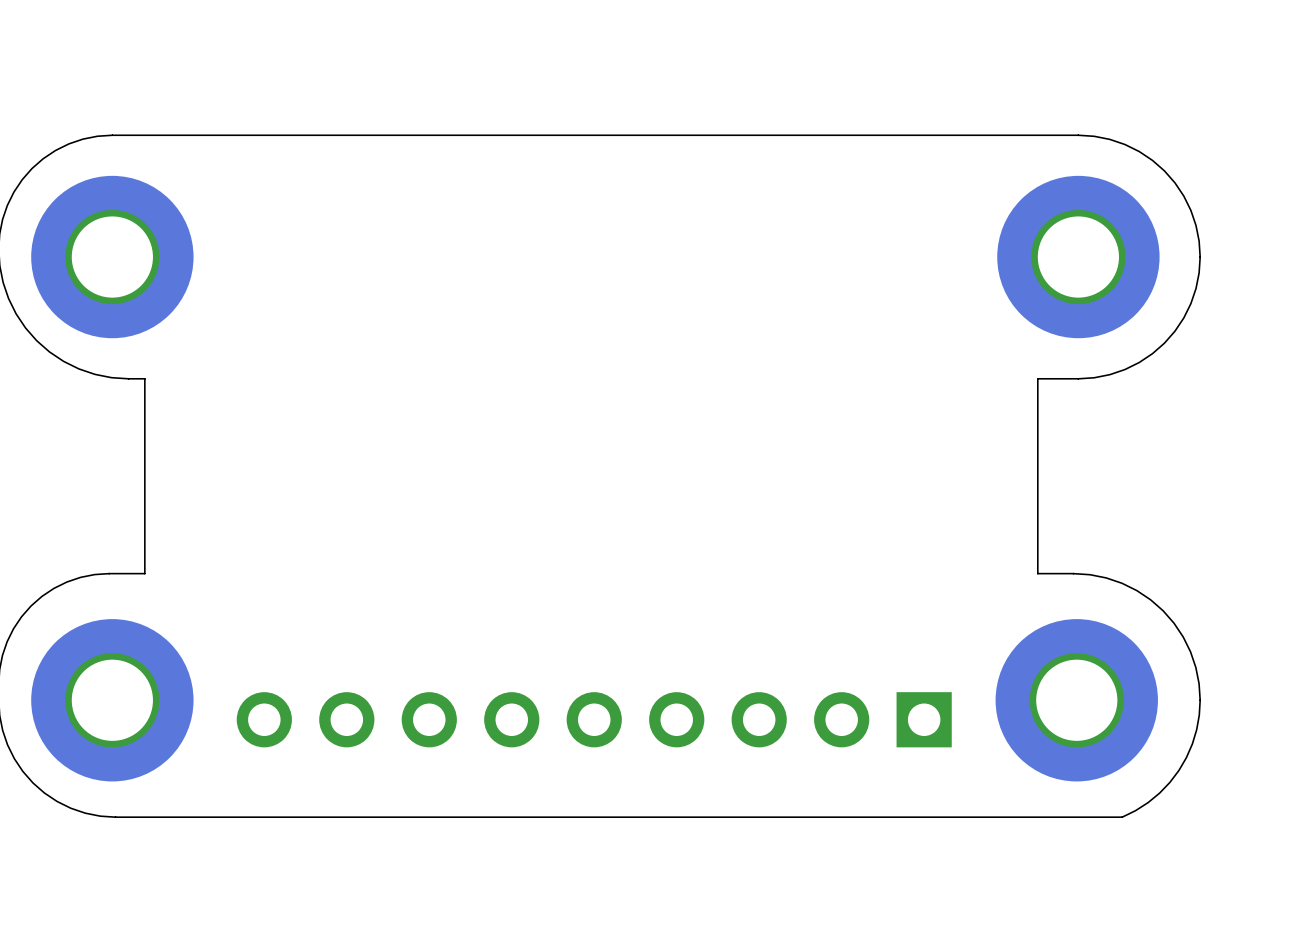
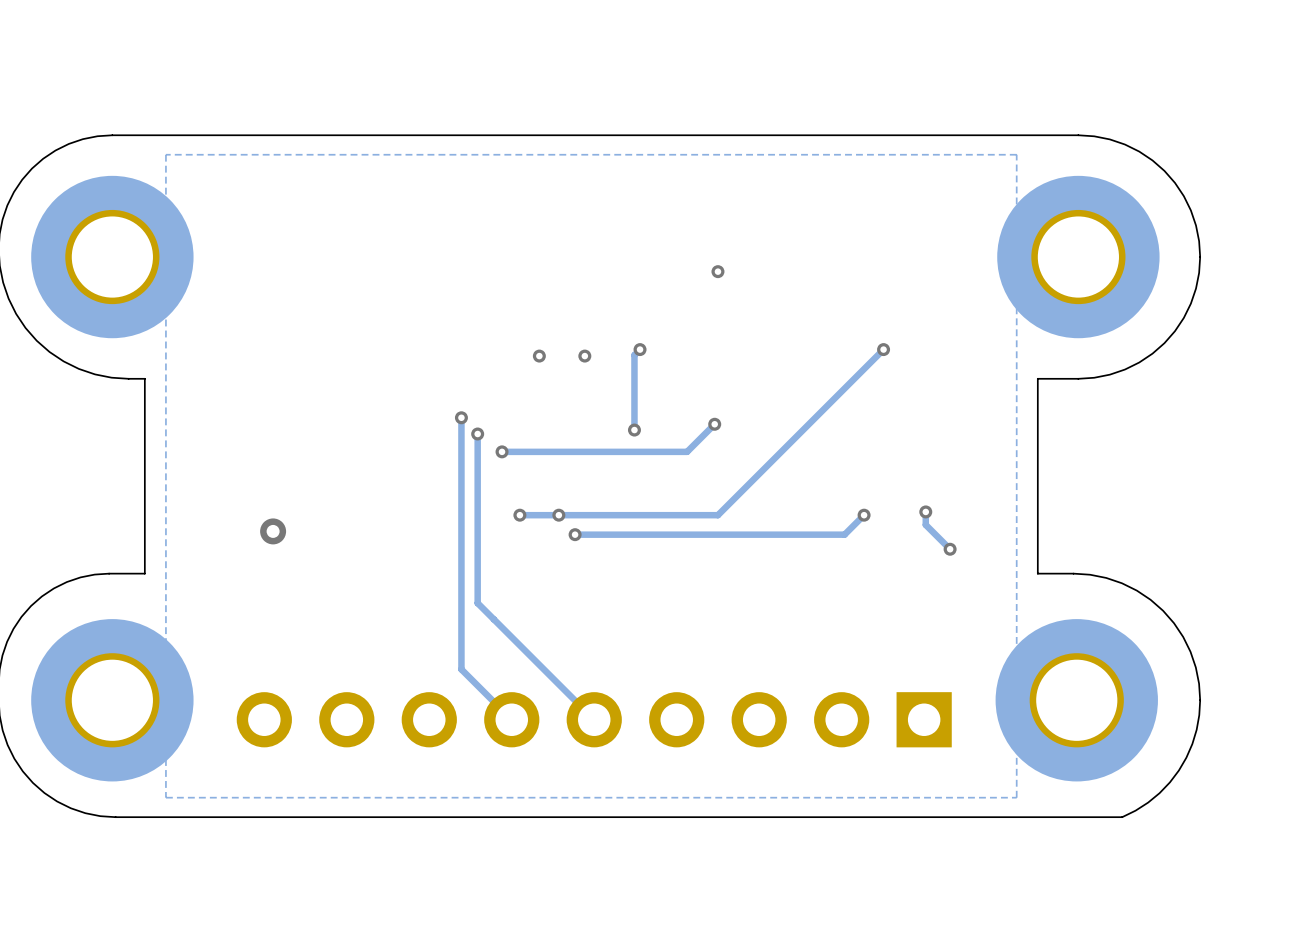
zone outline: none -> (1016, 154) (1016, 797) (165, 797) (165, 154) (1016, 154)
via: none -> (717, 271)
track: none -> (640, 349) (634, 355) (634, 430)
via: none -> (640, 349)
track: none -> (883, 349) (717, 515) (519, 515)
via: none -> (883, 349)
via: none -> (539, 356)
via: none -> (584, 356)
track: none -> (461, 417) (461, 669) (511, 719)
via: none -> (461, 417)
track: none -> (714, 424) (687, 451) (502, 451)
via: none -> (714, 424)
via: none -> (634, 430)
track: none -> (477, 434) (477, 603) (594, 719)
via: none -> (477, 434)
via: none -> (502, 451)
track: none -> (925, 511) (925, 524) (950, 549)
via: none -> (925, 511)
via: none -> (519, 515)
via: none -> (558, 515)
track: none -> (864, 515) (844, 534) (575, 534)
via: none -> (864, 515)
via: none -> (273, 531)
via: none -> (575, 534)
via: none -> (950, 549)

